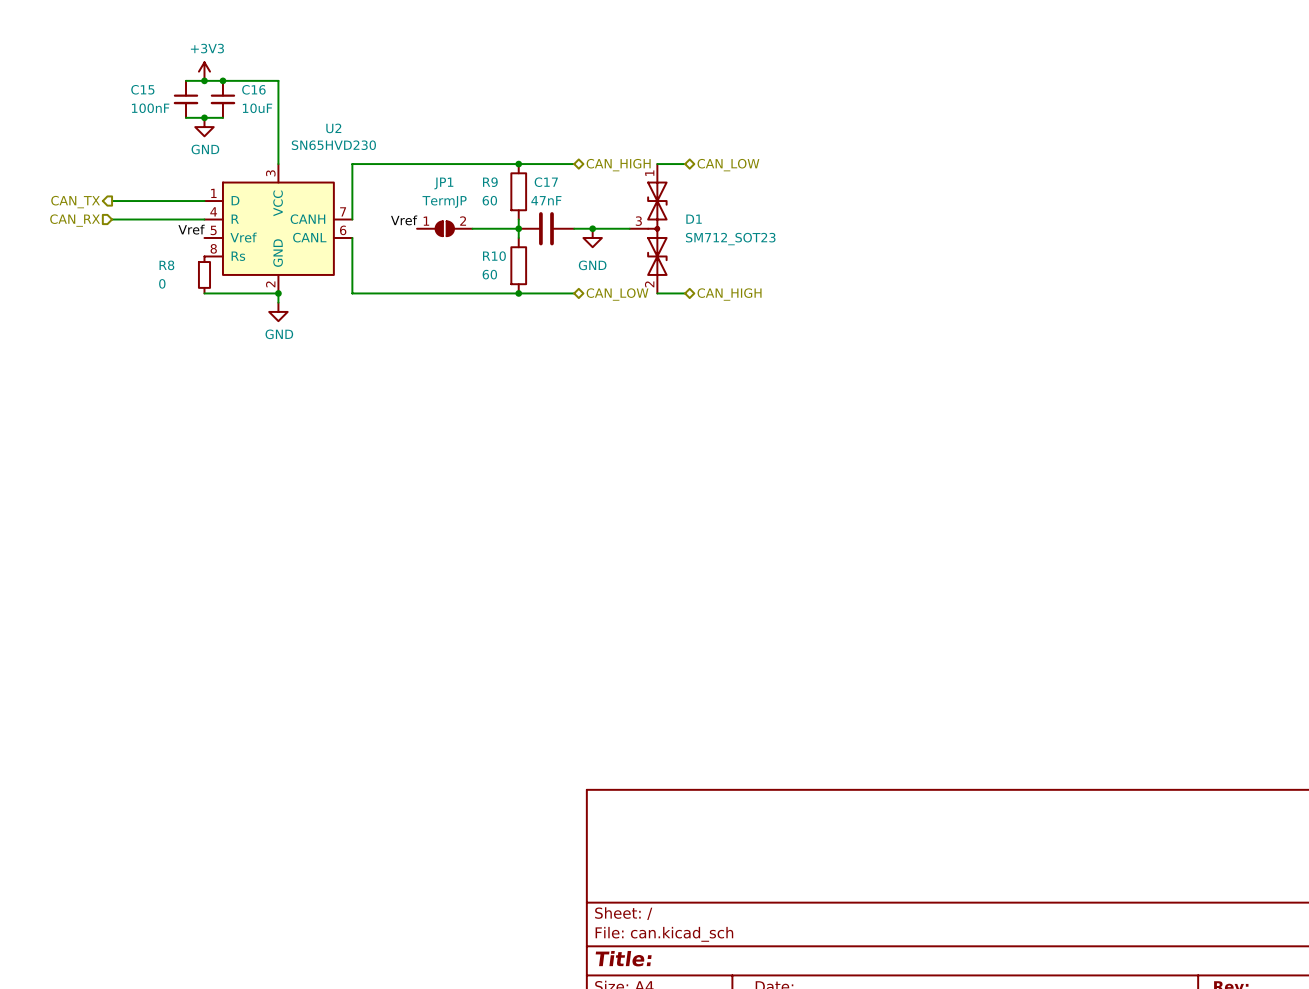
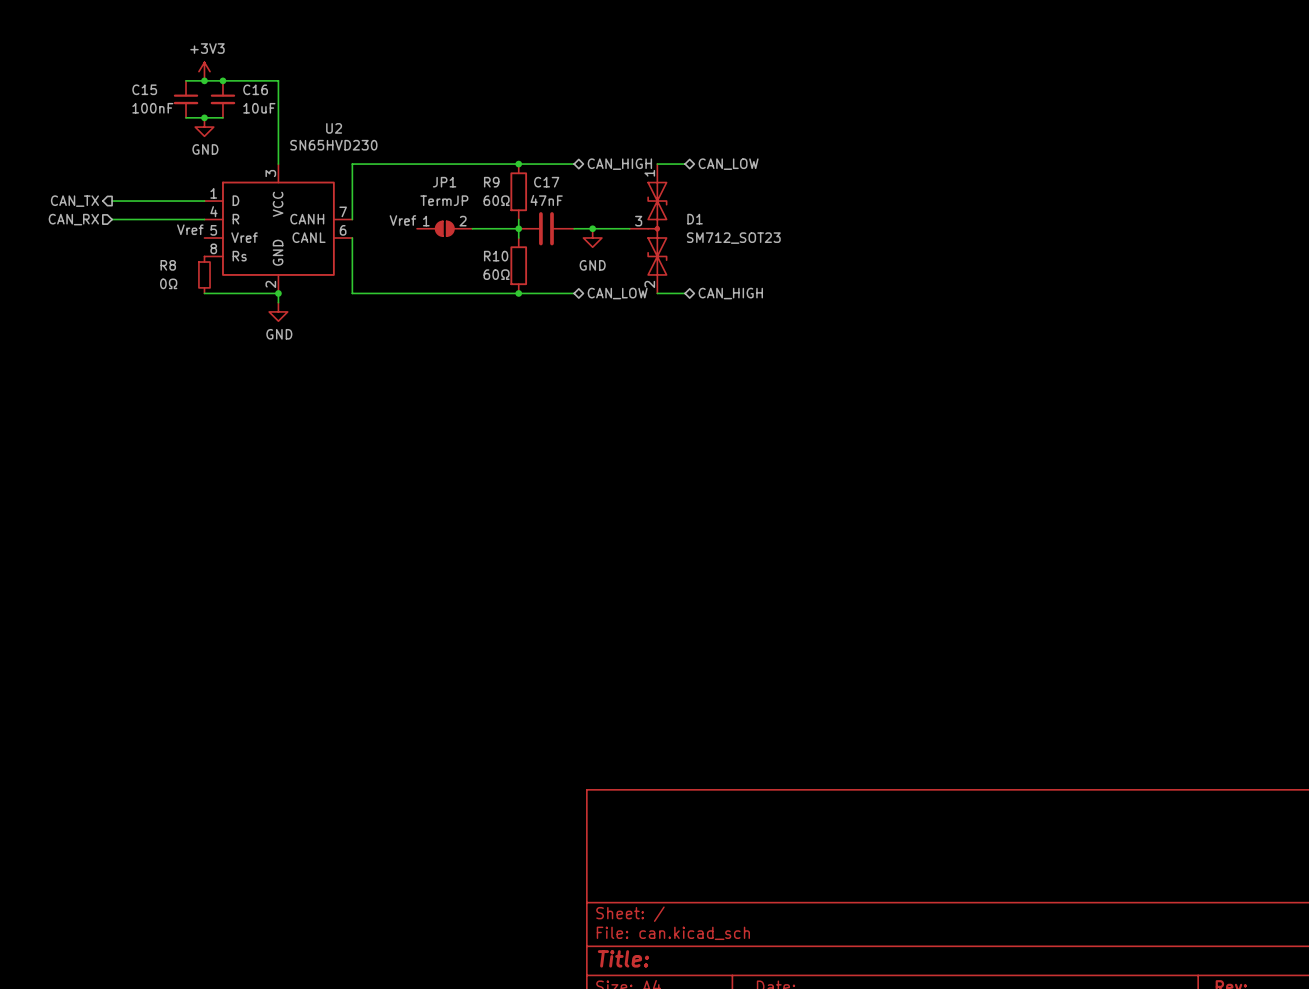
R9 value: 60 (489, 200) -> 60Ω (496, 200)
R10 value: 60 (489, 274) -> 60Ω (496, 274)
R8 value: 0 (162, 283) -> 0Ω (168, 283)

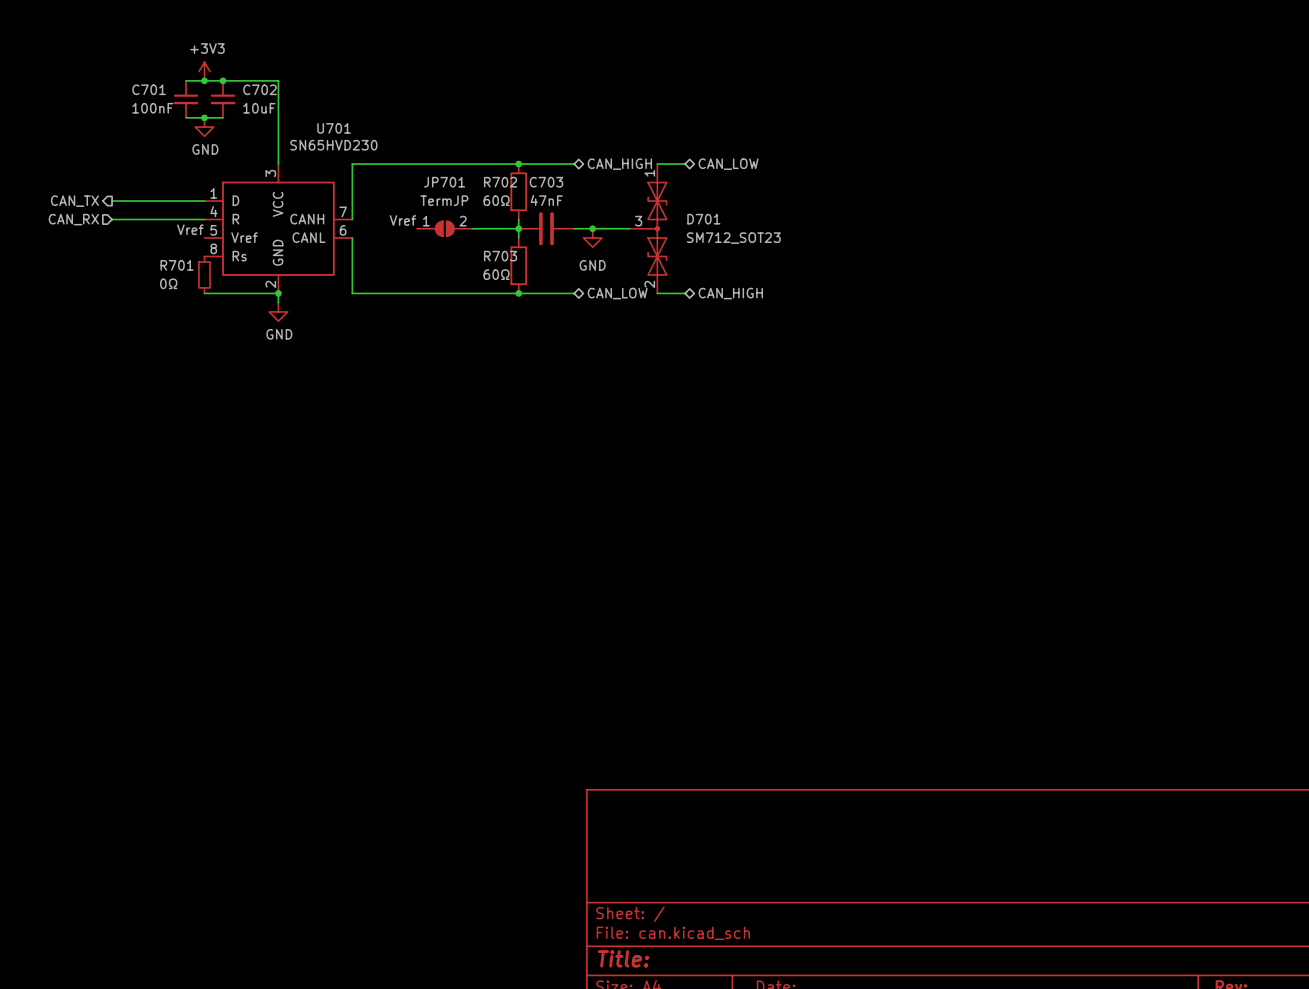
C15 name: C15 (144, 89) -> C701 (149, 89)
C16 name: C16 (255, 89) -> C702 (260, 89)
U2 name: U2 (334, 128) -> U701 (334, 128)
JP1 name: JP1 (444, 182) -> JP701 (444, 182)
R9 name: R9 (491, 182) -> R702 (500, 182)
C17 name: C17 (546, 182) -> C703 (546, 182)
D1 name: D1 (695, 219) -> D701 (703, 219)
R10 name: R10 (496, 256) -> R703 (500, 256)
R8 name: R8 (168, 265) -> R701 (177, 265)

